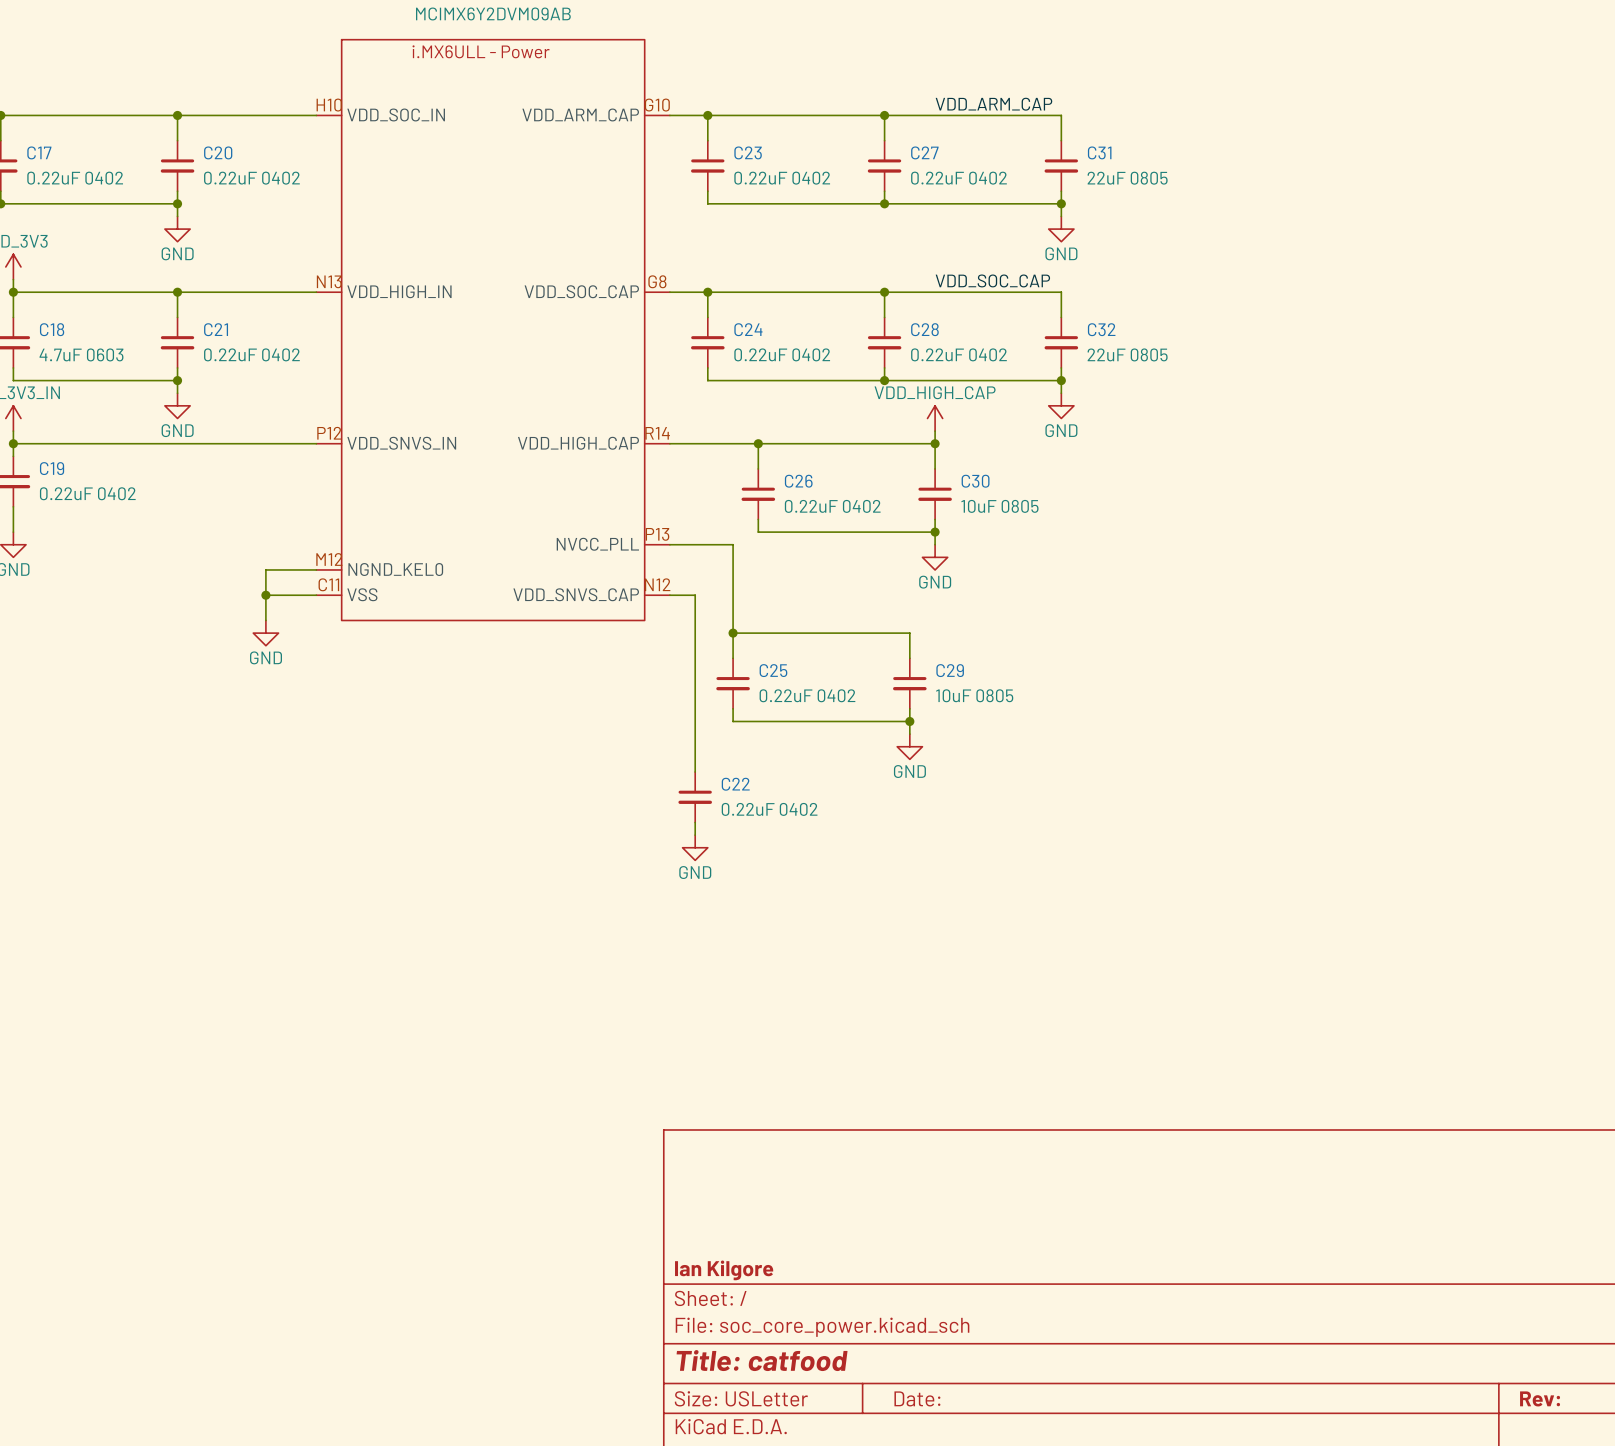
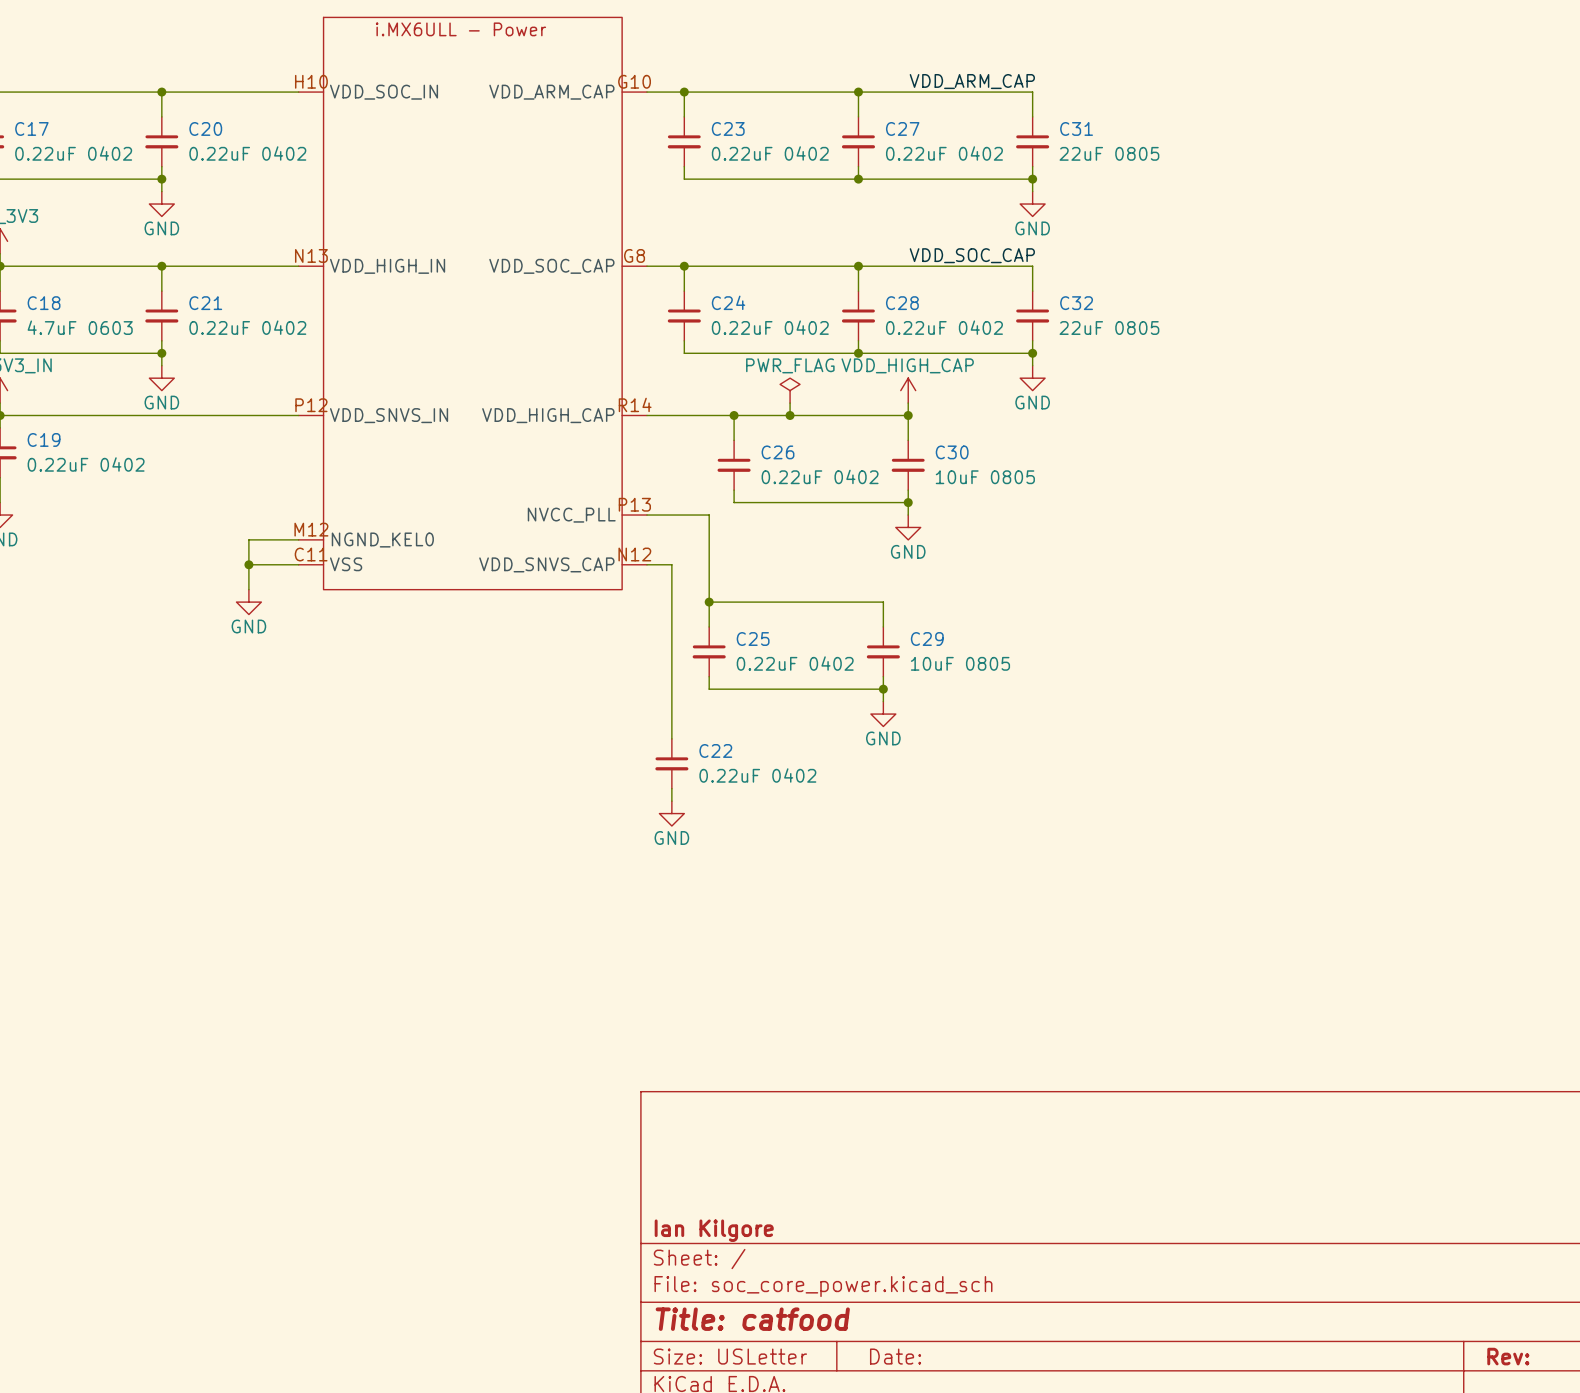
power symbol: none -> PWR_FLAG (790, 390)
wire: none -> (790, 403) (790, 415)
junction: none -> (790, 415)

